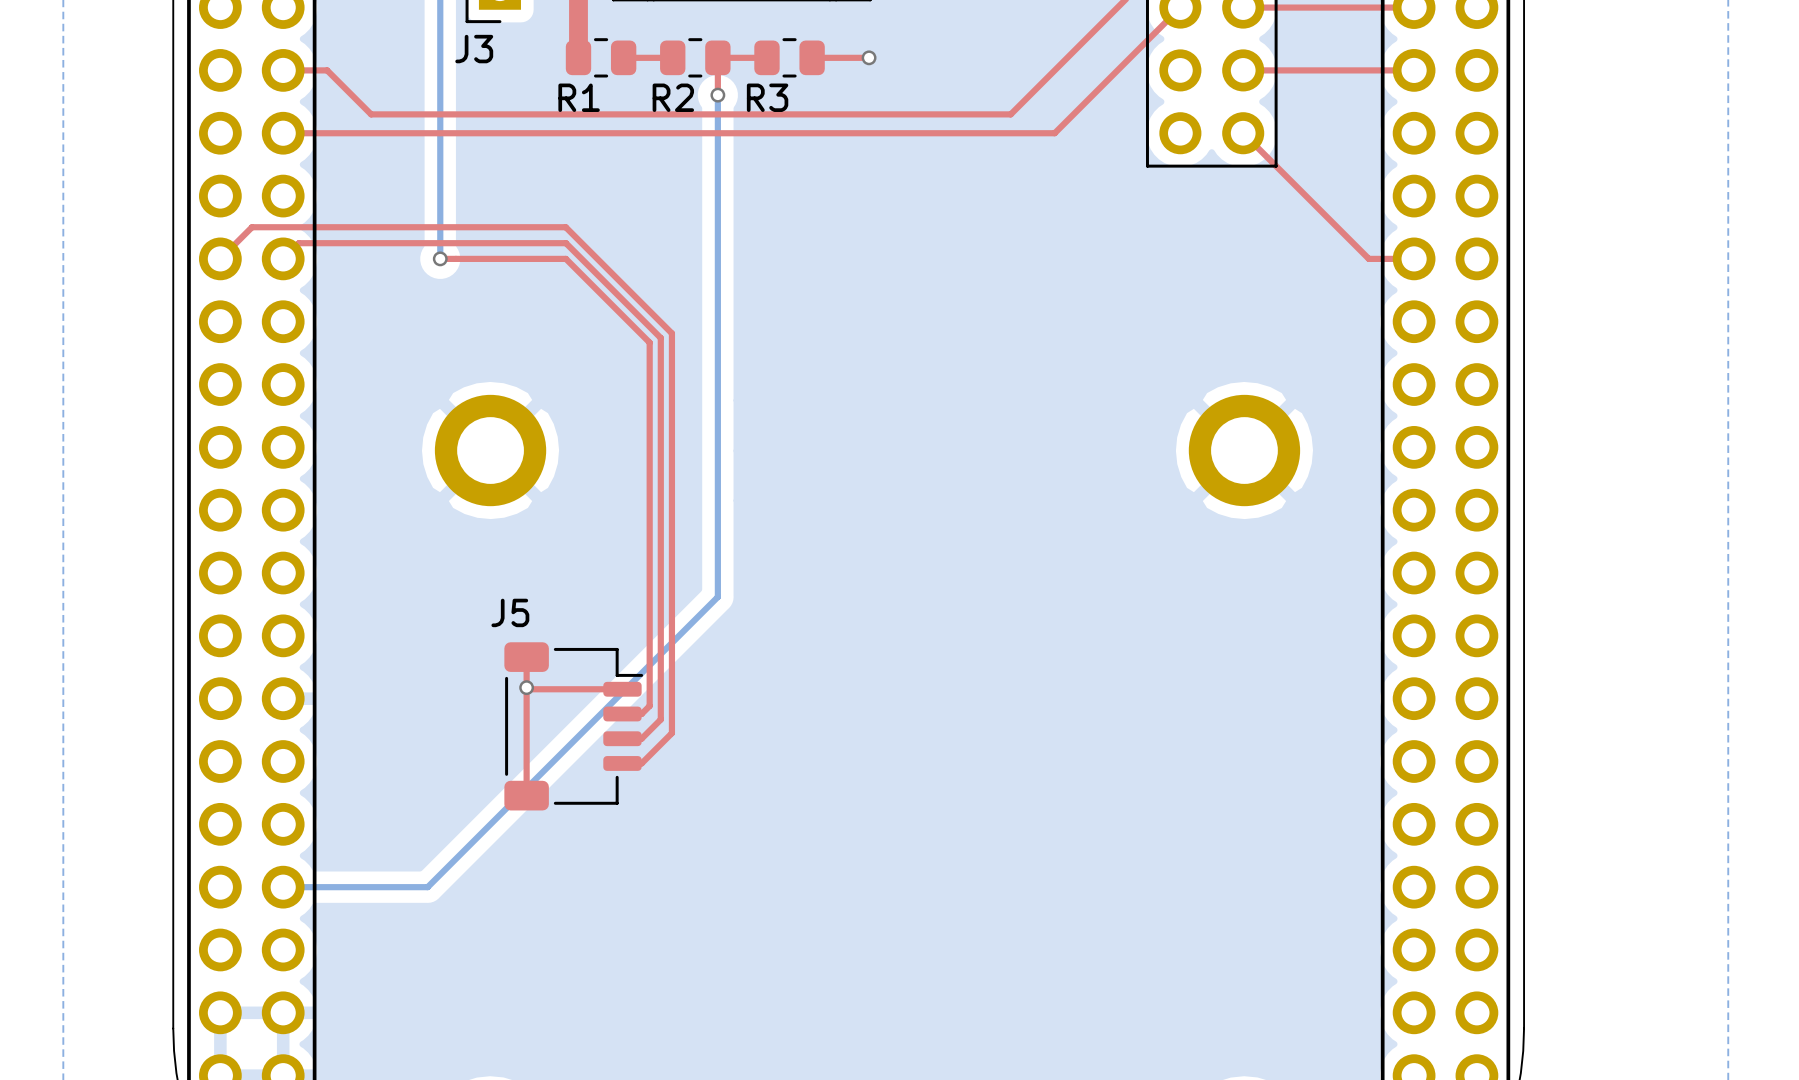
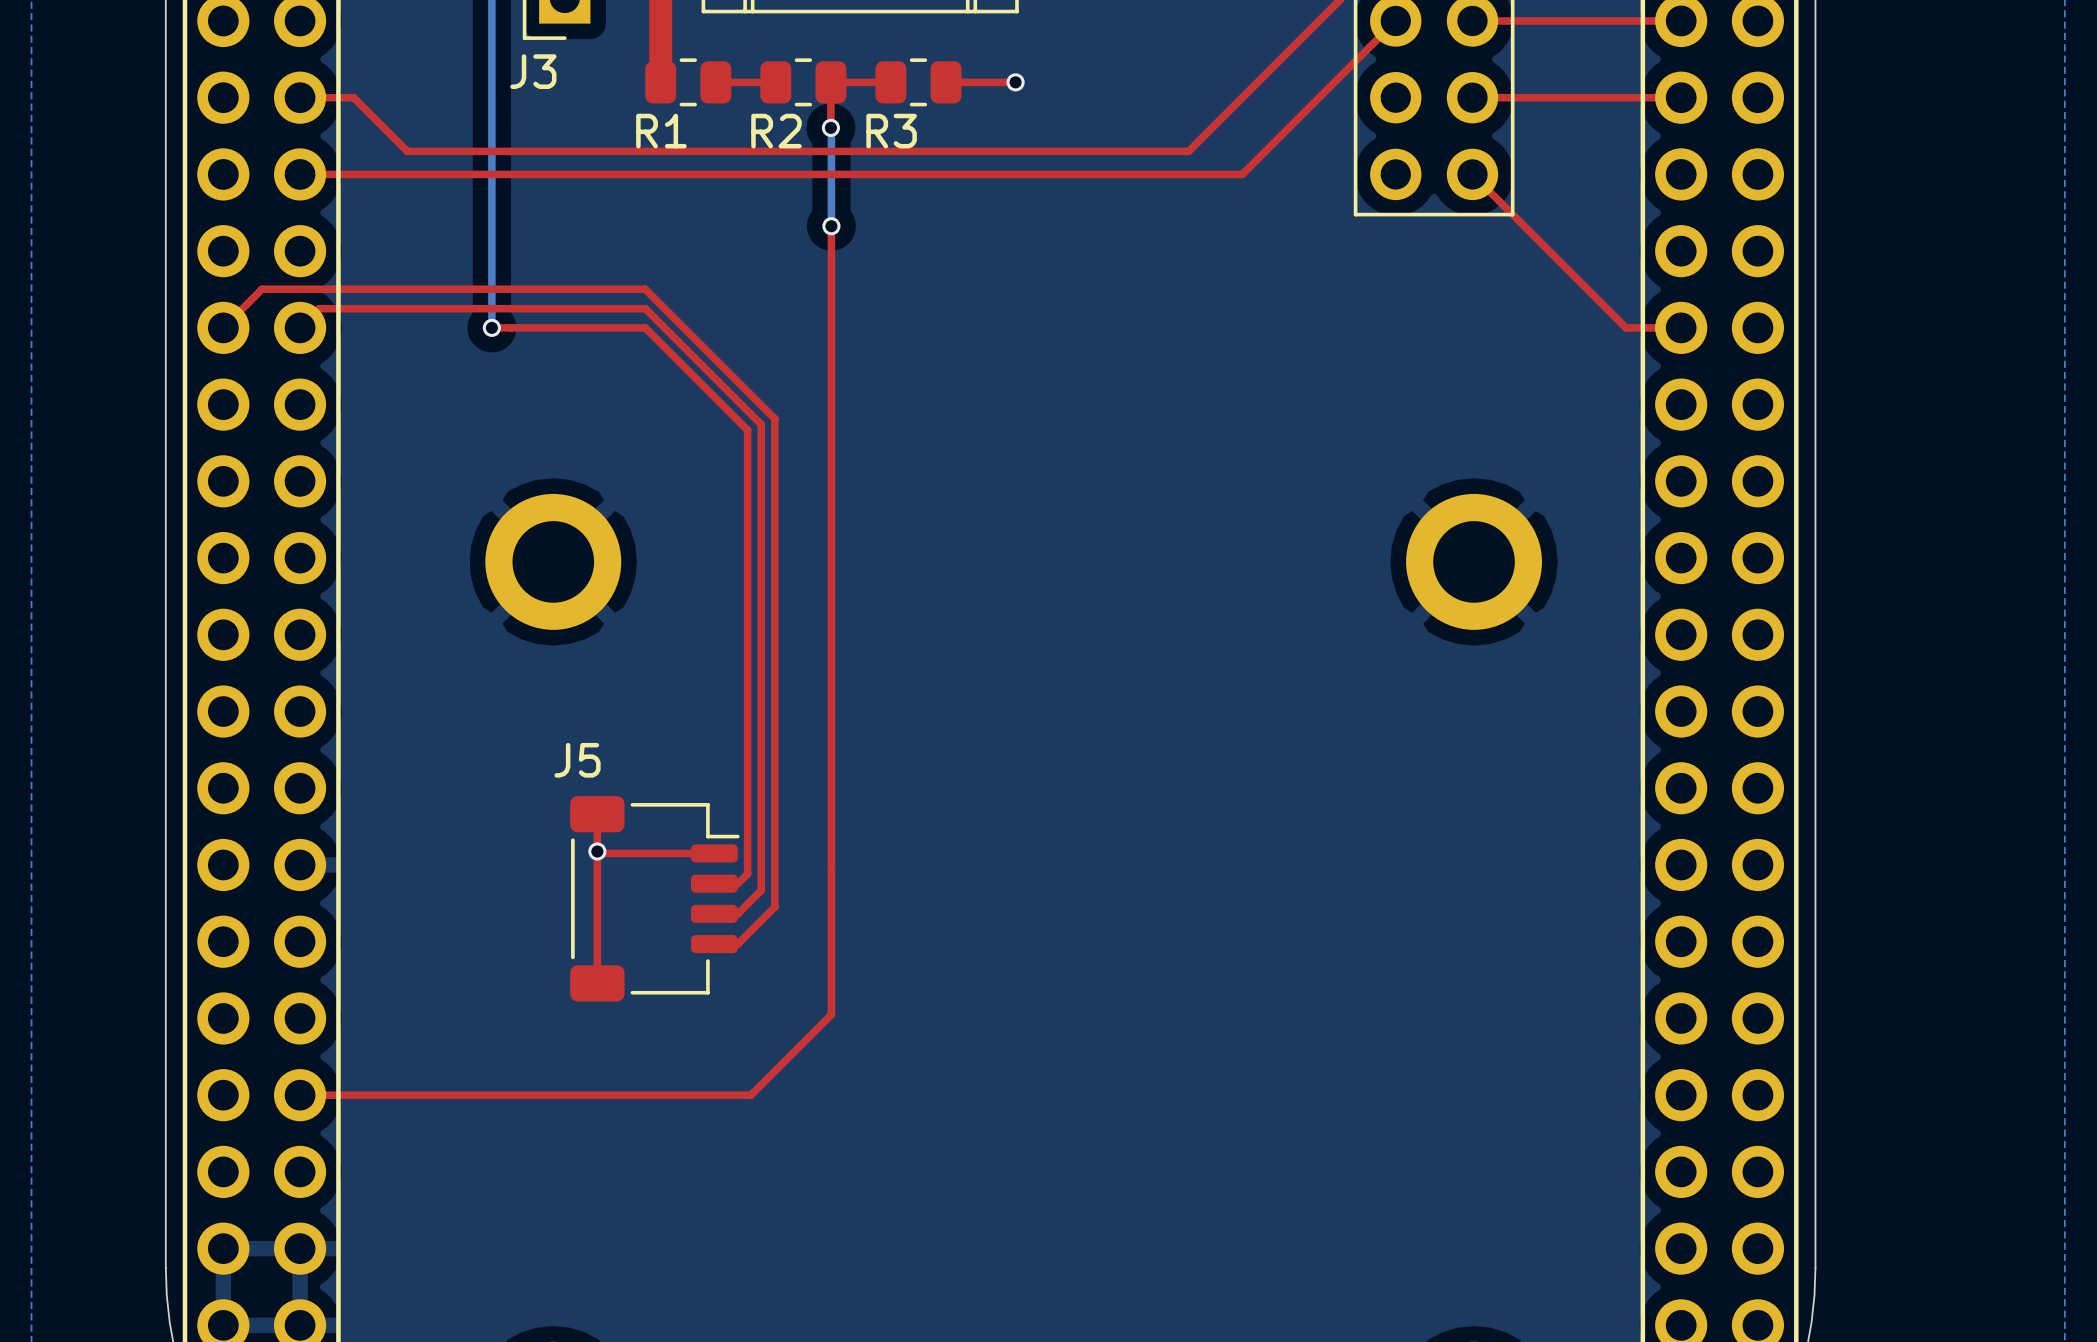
bottom track: (717, 95) (717, 596) (427, 887) (283, 887) -> (830, 127) (831, 226)
top track: none -> (831, 226) (831, 1014) (750, 1095) (300, 1095)
via: none -> (831, 226)

